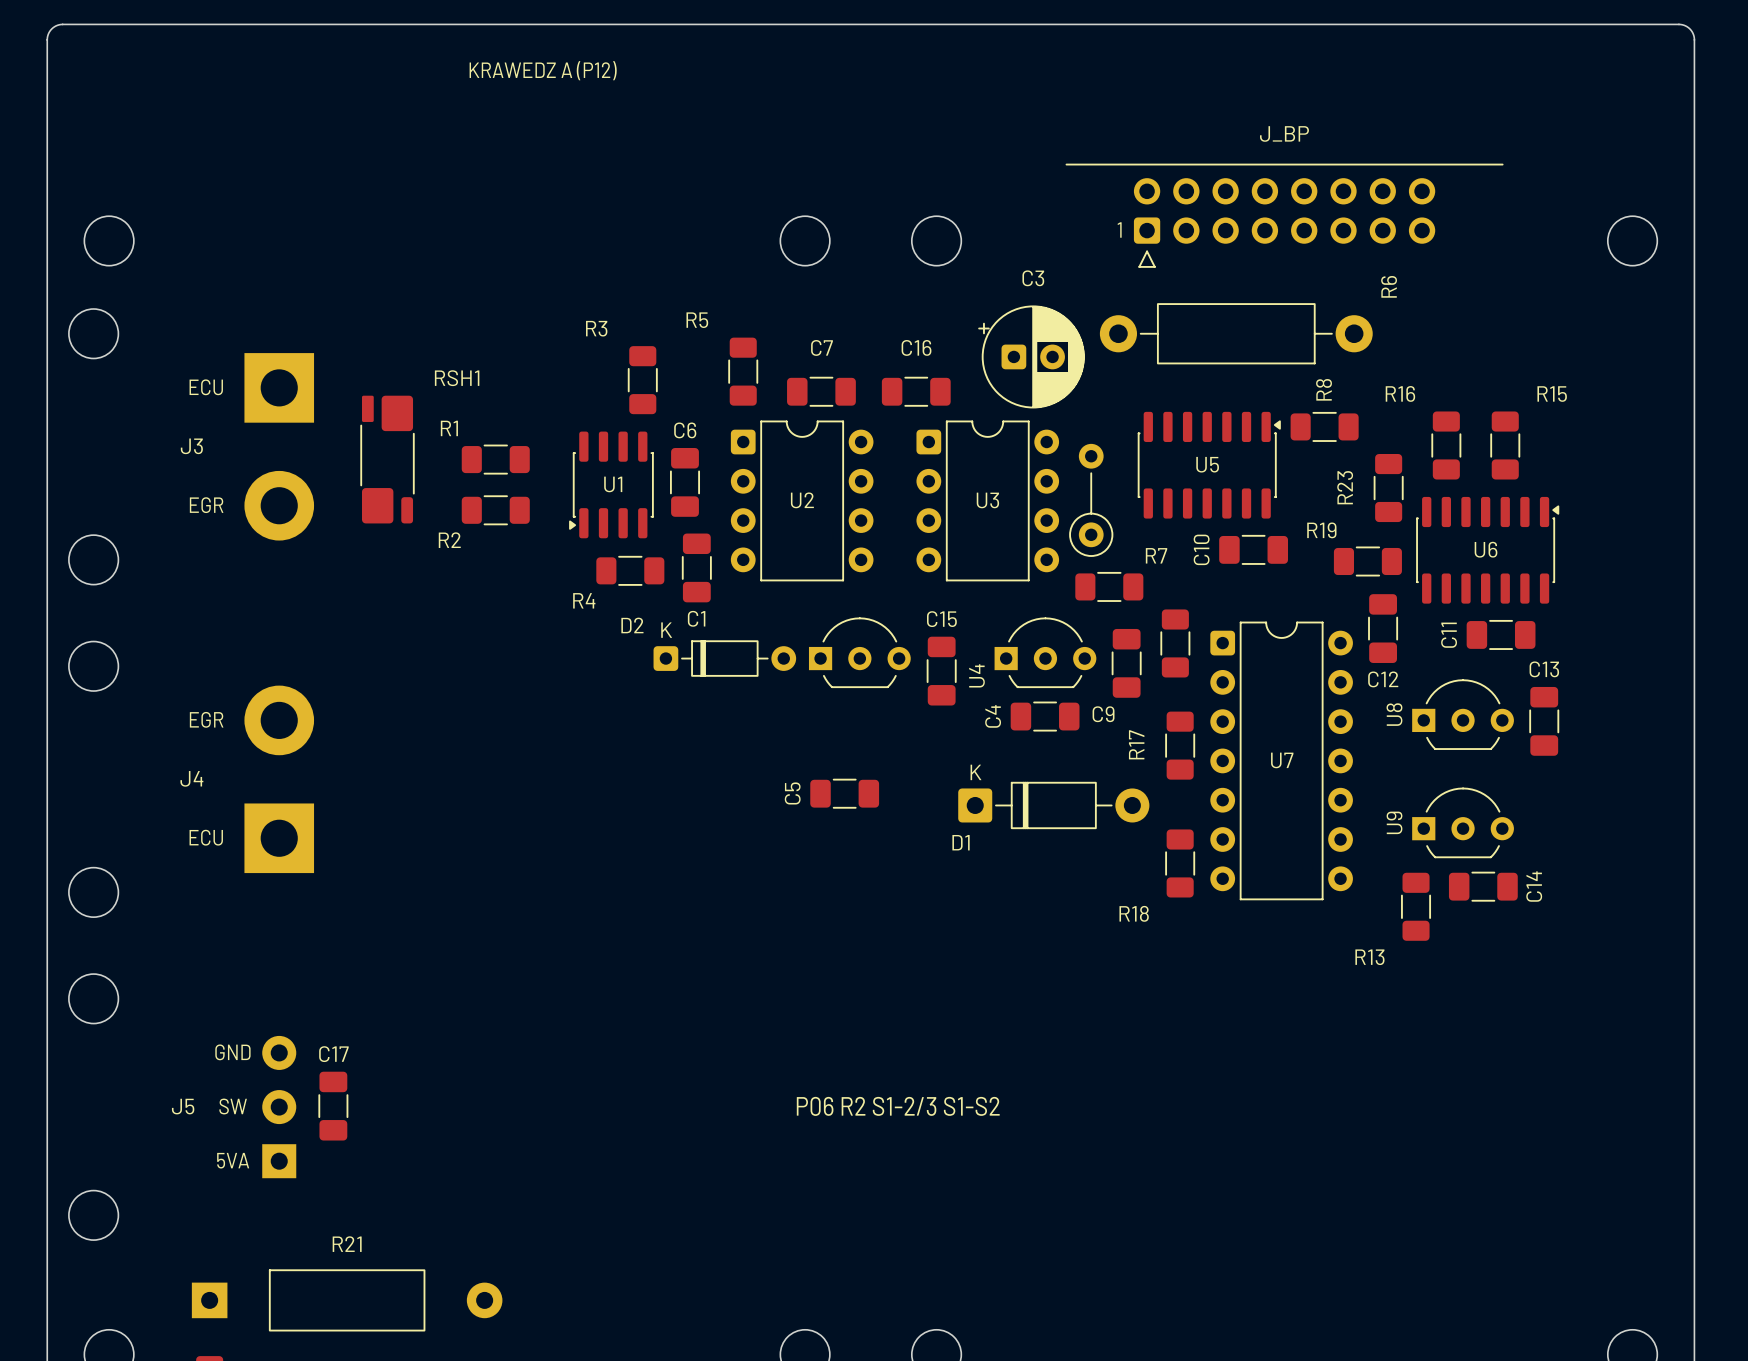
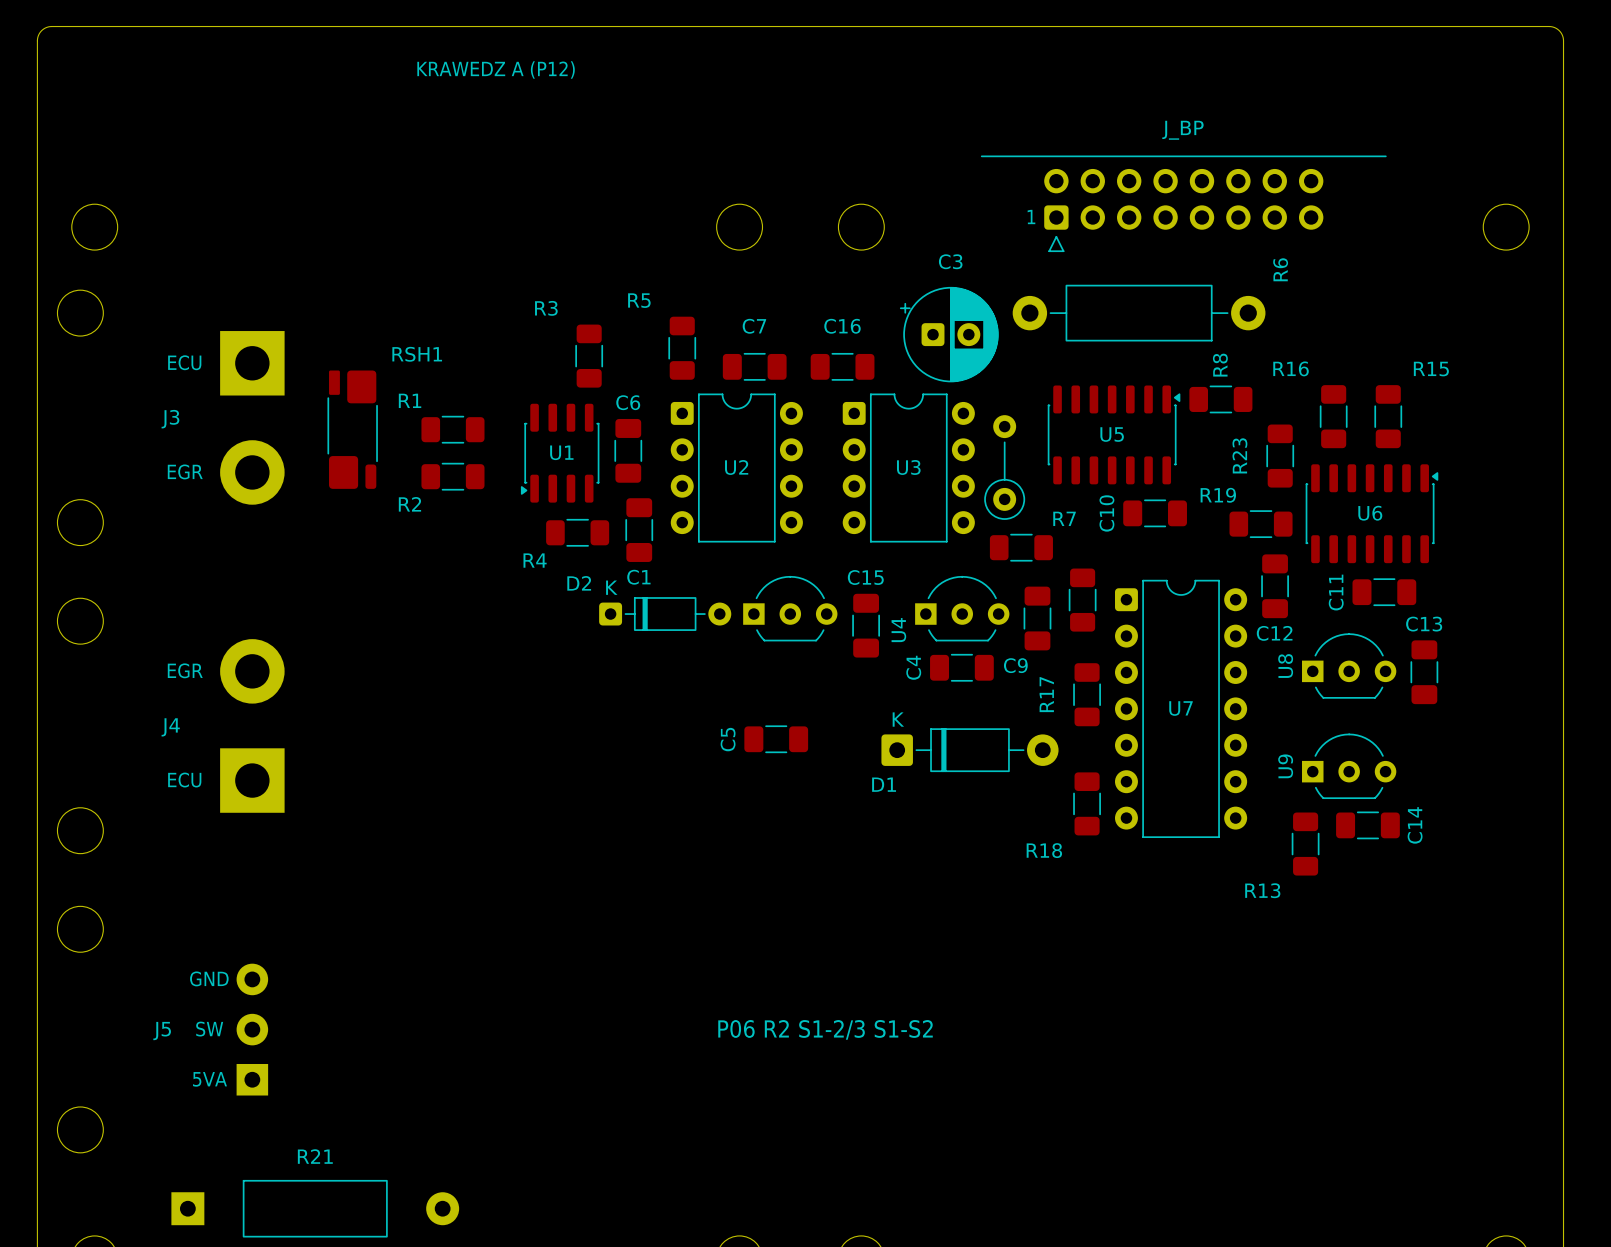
C17: (333, 1106) -> none

